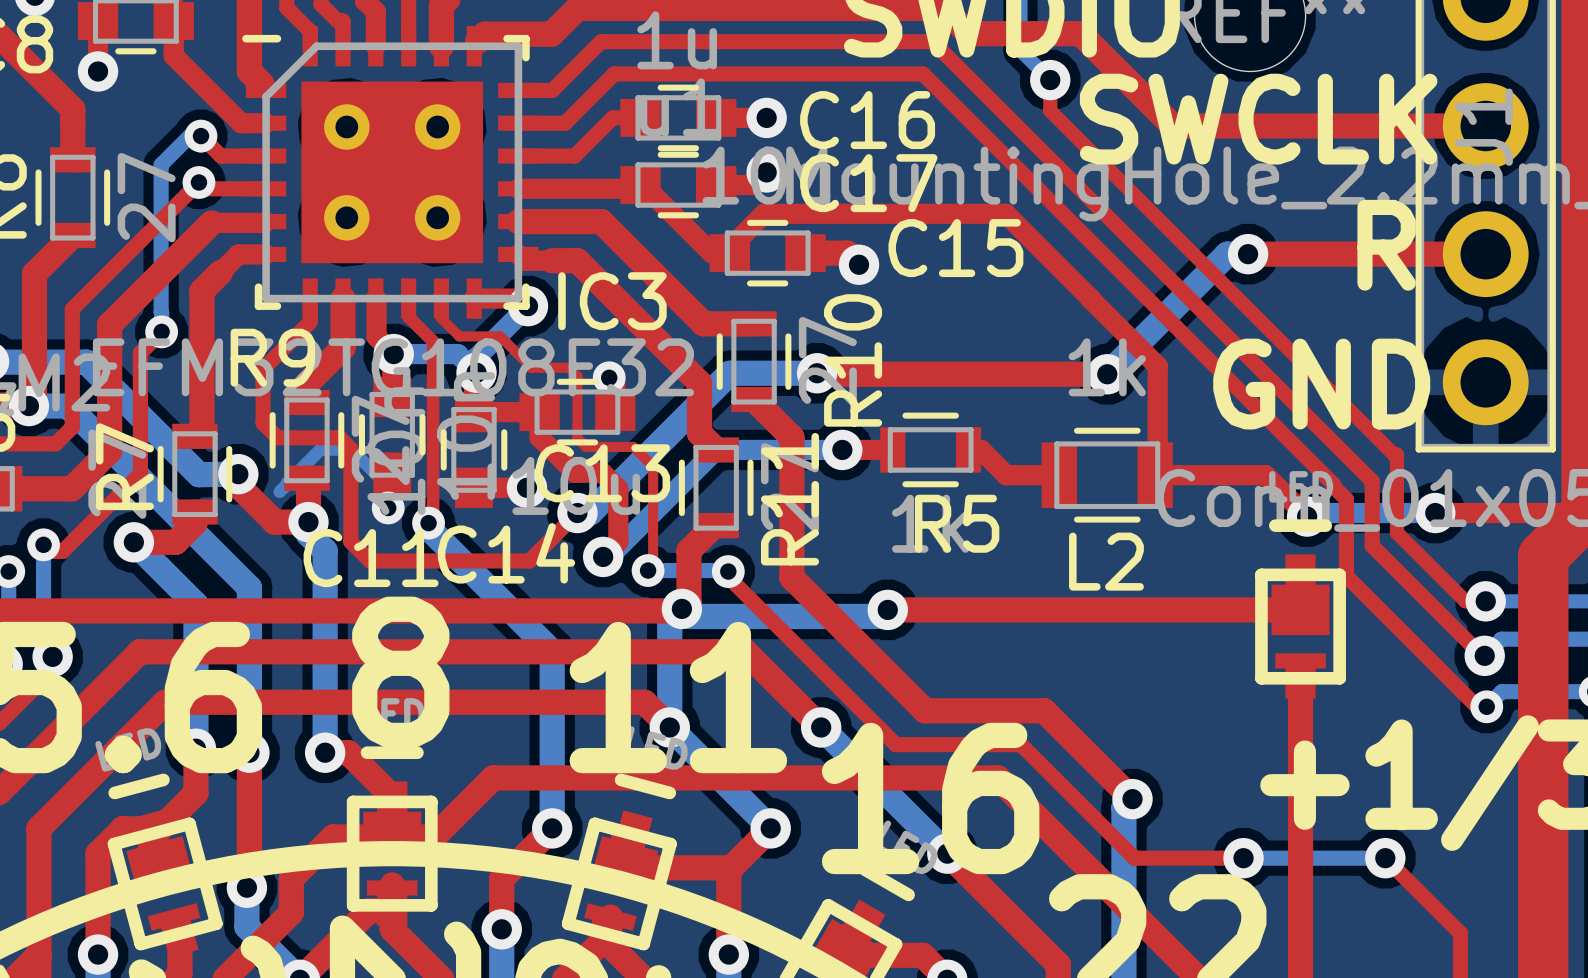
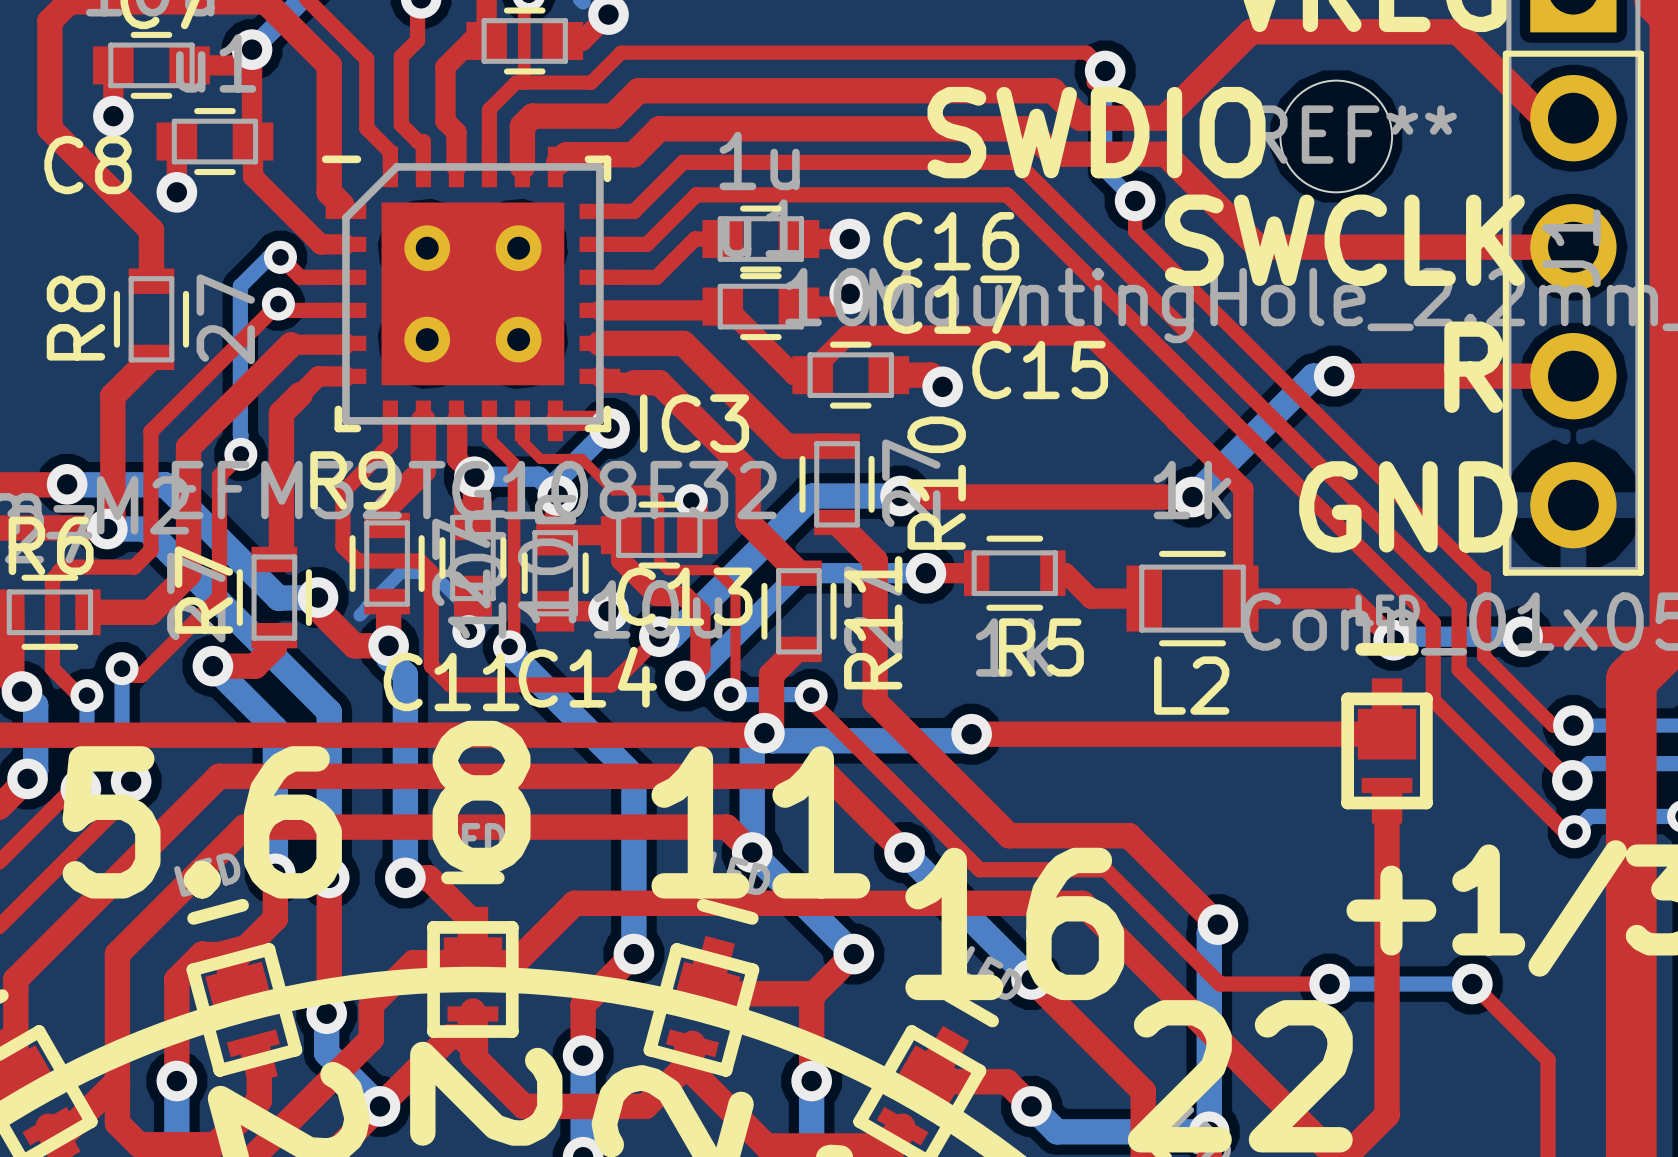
top track: (665, 349) (699, 382) (699, 433) -> (748, 471) (748, 522) (782, 556)

